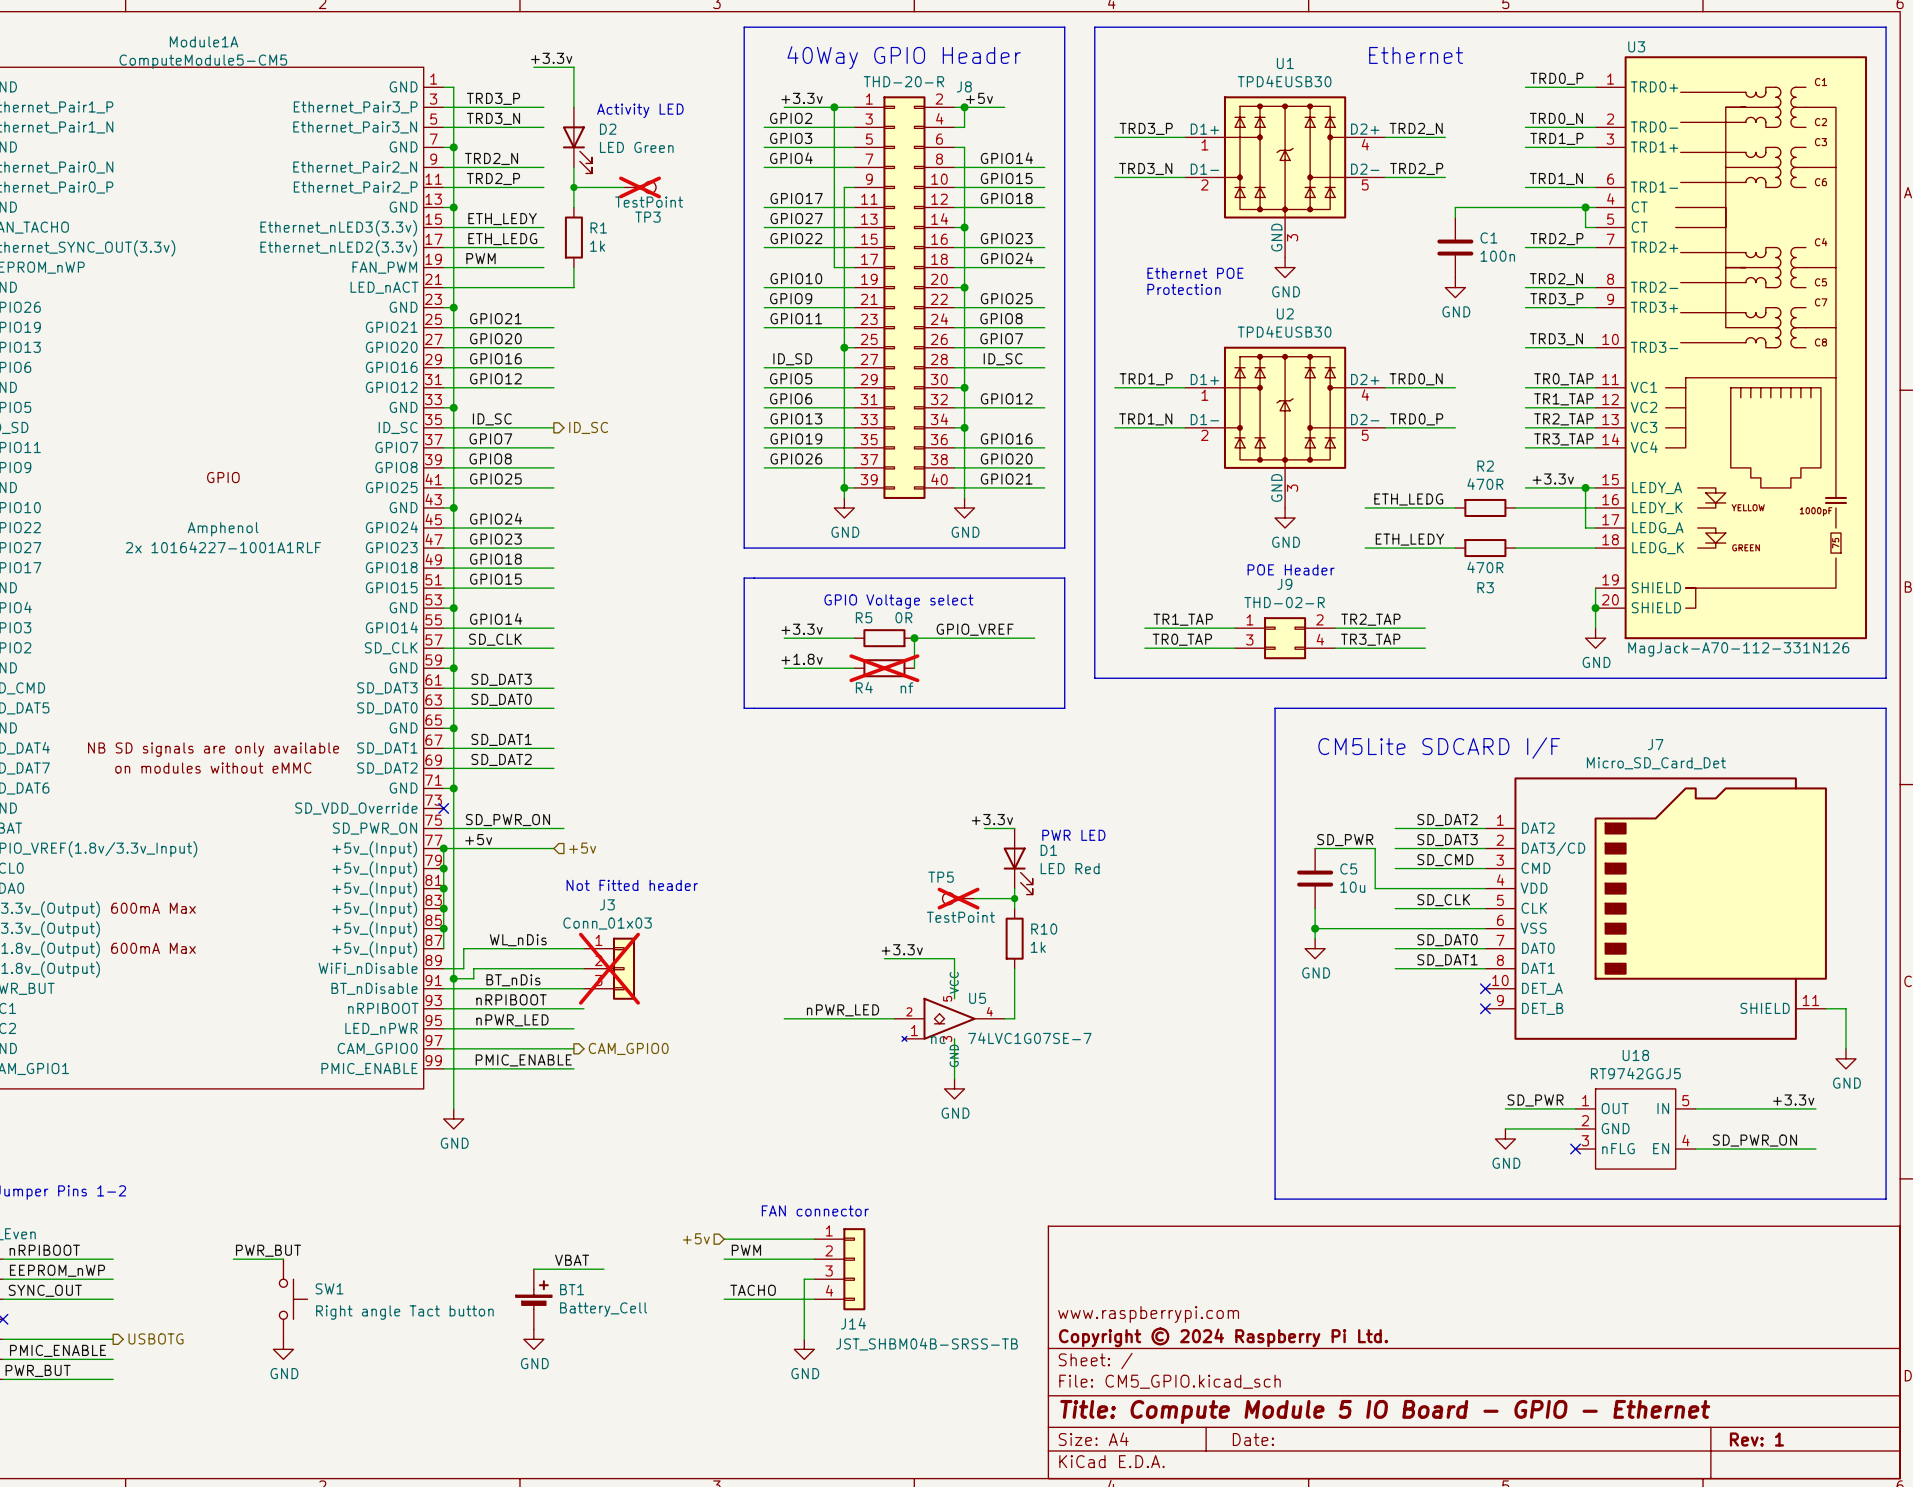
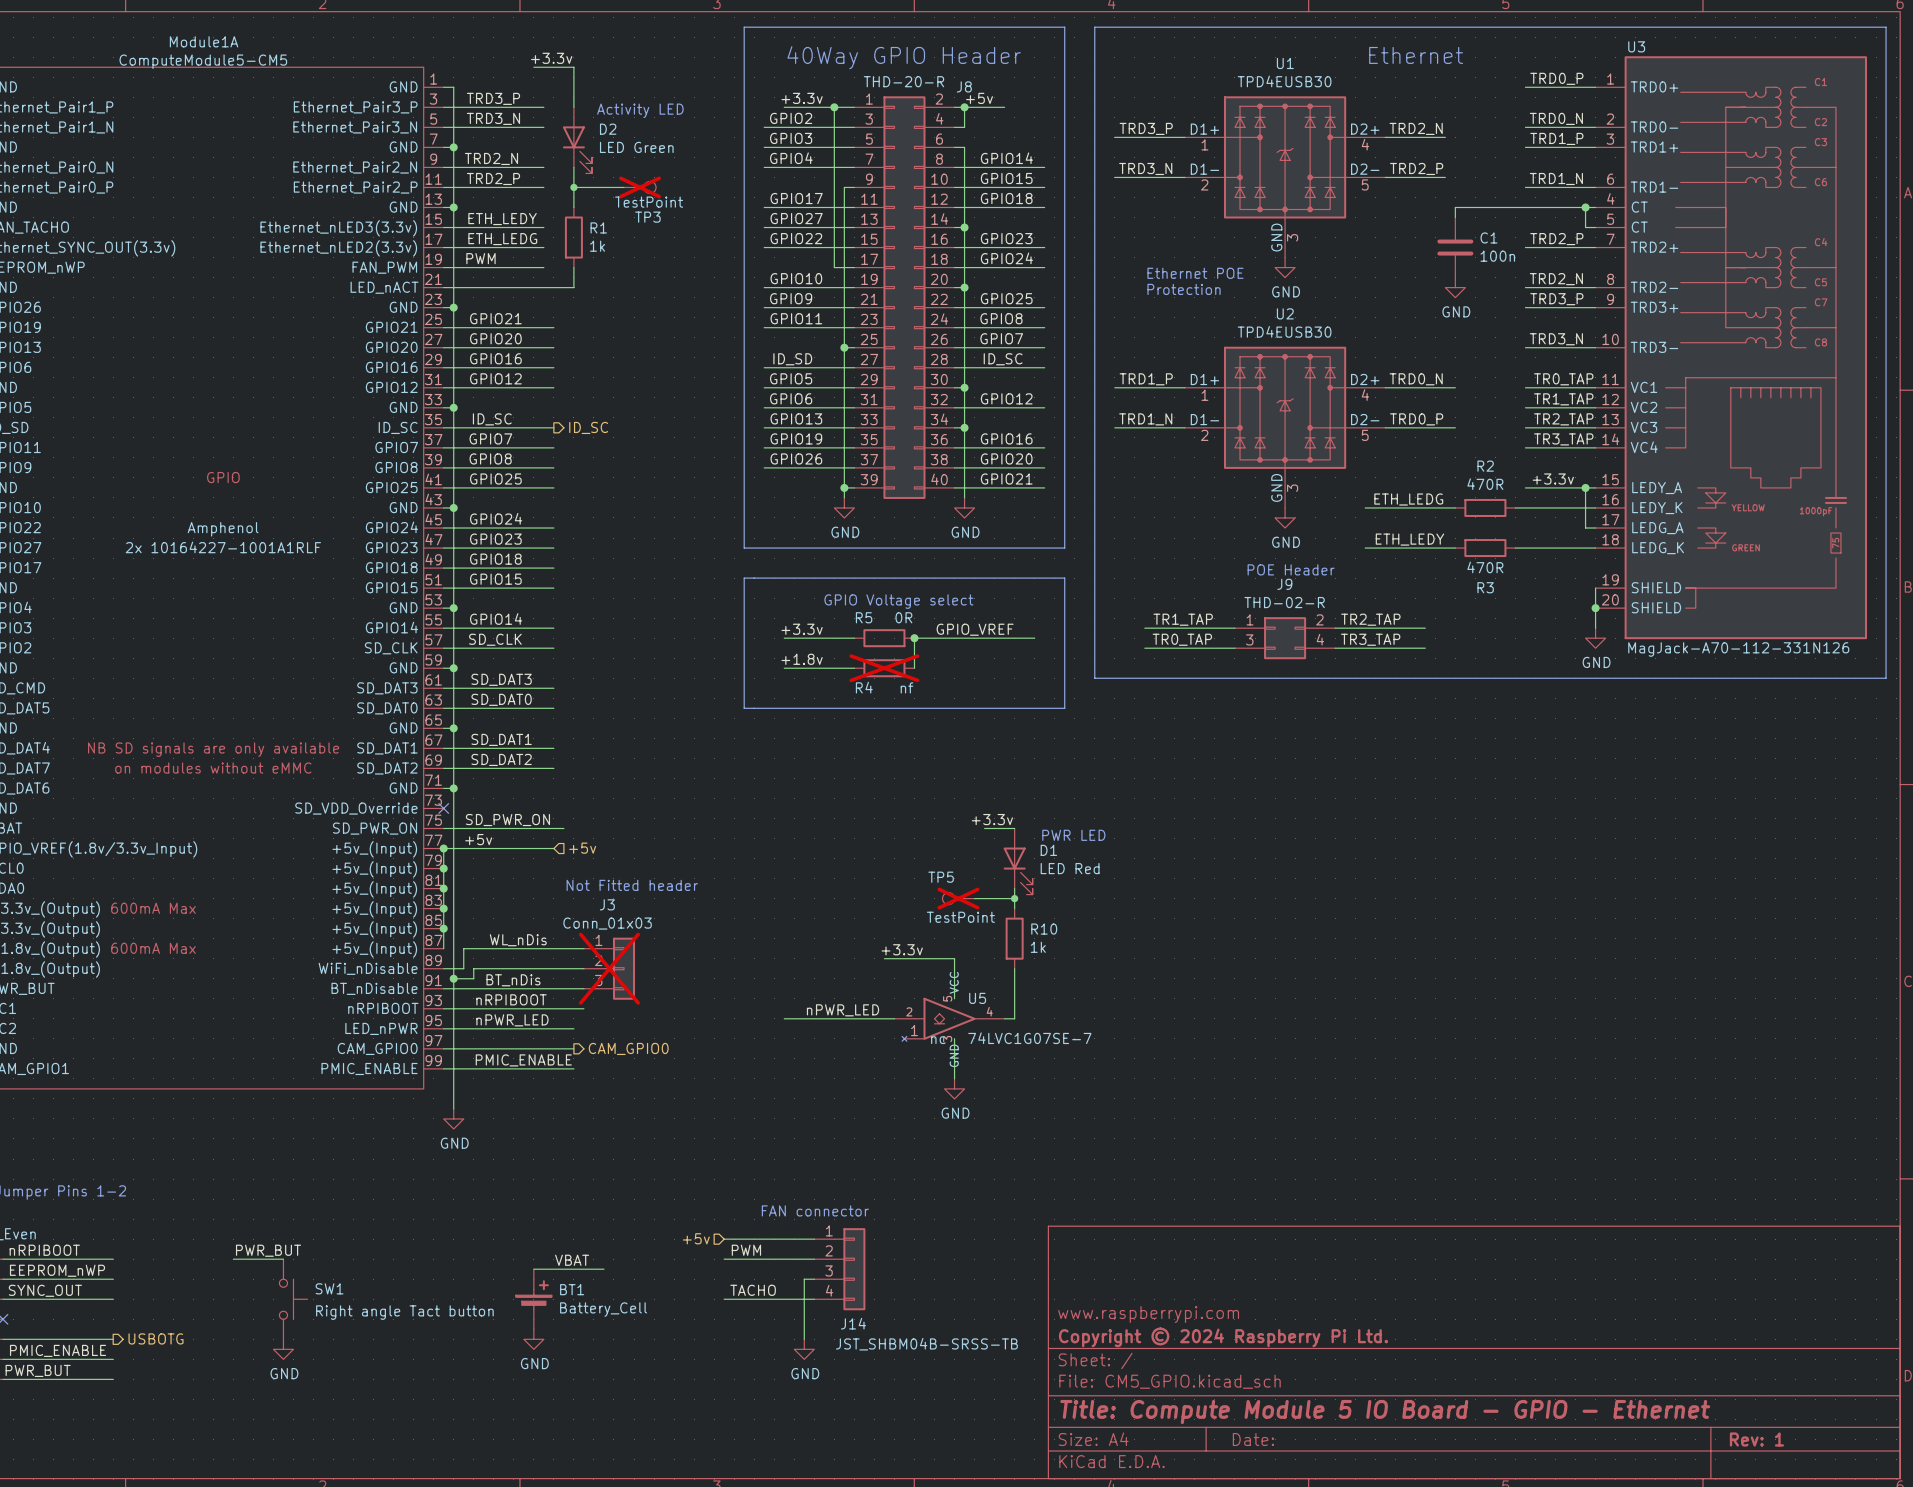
line: (1275, 708) (1275, 1199) (1886, 1199) (1886, 708) (1275, 708) -> none
text: CM5Lite SDCARD I/F (1439, 748) -> none
label: SD_DAT2 (1447, 820) -> none
wire: (1395, 828) (1485, 828) -> none
label: SD_PWR (1345, 840) -> none
label: SD_DAT3 (1447, 840) -> none
wire: (1315, 848) (1375, 848) (1375, 888) (1485, 888) -> none
wire: (1395, 848) (1485, 848) -> none
label: SD_CMD (1445, 860) -> none
wire: (1395, 868) (1485, 868) -> none
C5: 10u (1315, 878) -> none
label: SD_CLK (1443, 900) -> none
wire: (1315, 908) (1315, 938) -> none
wire: (1395, 908) (1485, 908) -> none
J7: Micro_SD_Card_Det (1656, 908) -> none
wire: (1315, 928) (1485, 928) -> none
junction: (1315, 928) -> none
label: SD_DAT0 (1447, 940) -> none
power symbol: GND (1315, 948) -> none
wire: (1395, 948) (1485, 948) -> none
label: SD_DAT1 (1447, 960) -> none
wire: (1395, 968) (1485, 968) -> none
no-connect mark: (1485, 988) -> none
no-connect mark: (1485, 1008) -> none
wire: (1825, 1008) (1845, 1008) (1845, 1048) -> none
power symbol: GND (1845, 1058) -> none
label: SD_PWR (1535, 1100) -> none
label: +3.3v (1793, 1100) -> none
wire: (1505, 1108) (1575, 1108) -> none
wire: (1695, 1108) (1815, 1108) -> none
wire: (1505, 1128) (1575, 1128) -> none
U18: RT9742GGJ5 (1635, 1128) -> none
power symbol: GND (1505, 1138) -> none
label: SD_PWR_ON (1754, 1140) -> none
no-connect mark: (1575, 1149) -> none
wire: (1695, 1149) (1815, 1149) -> none

